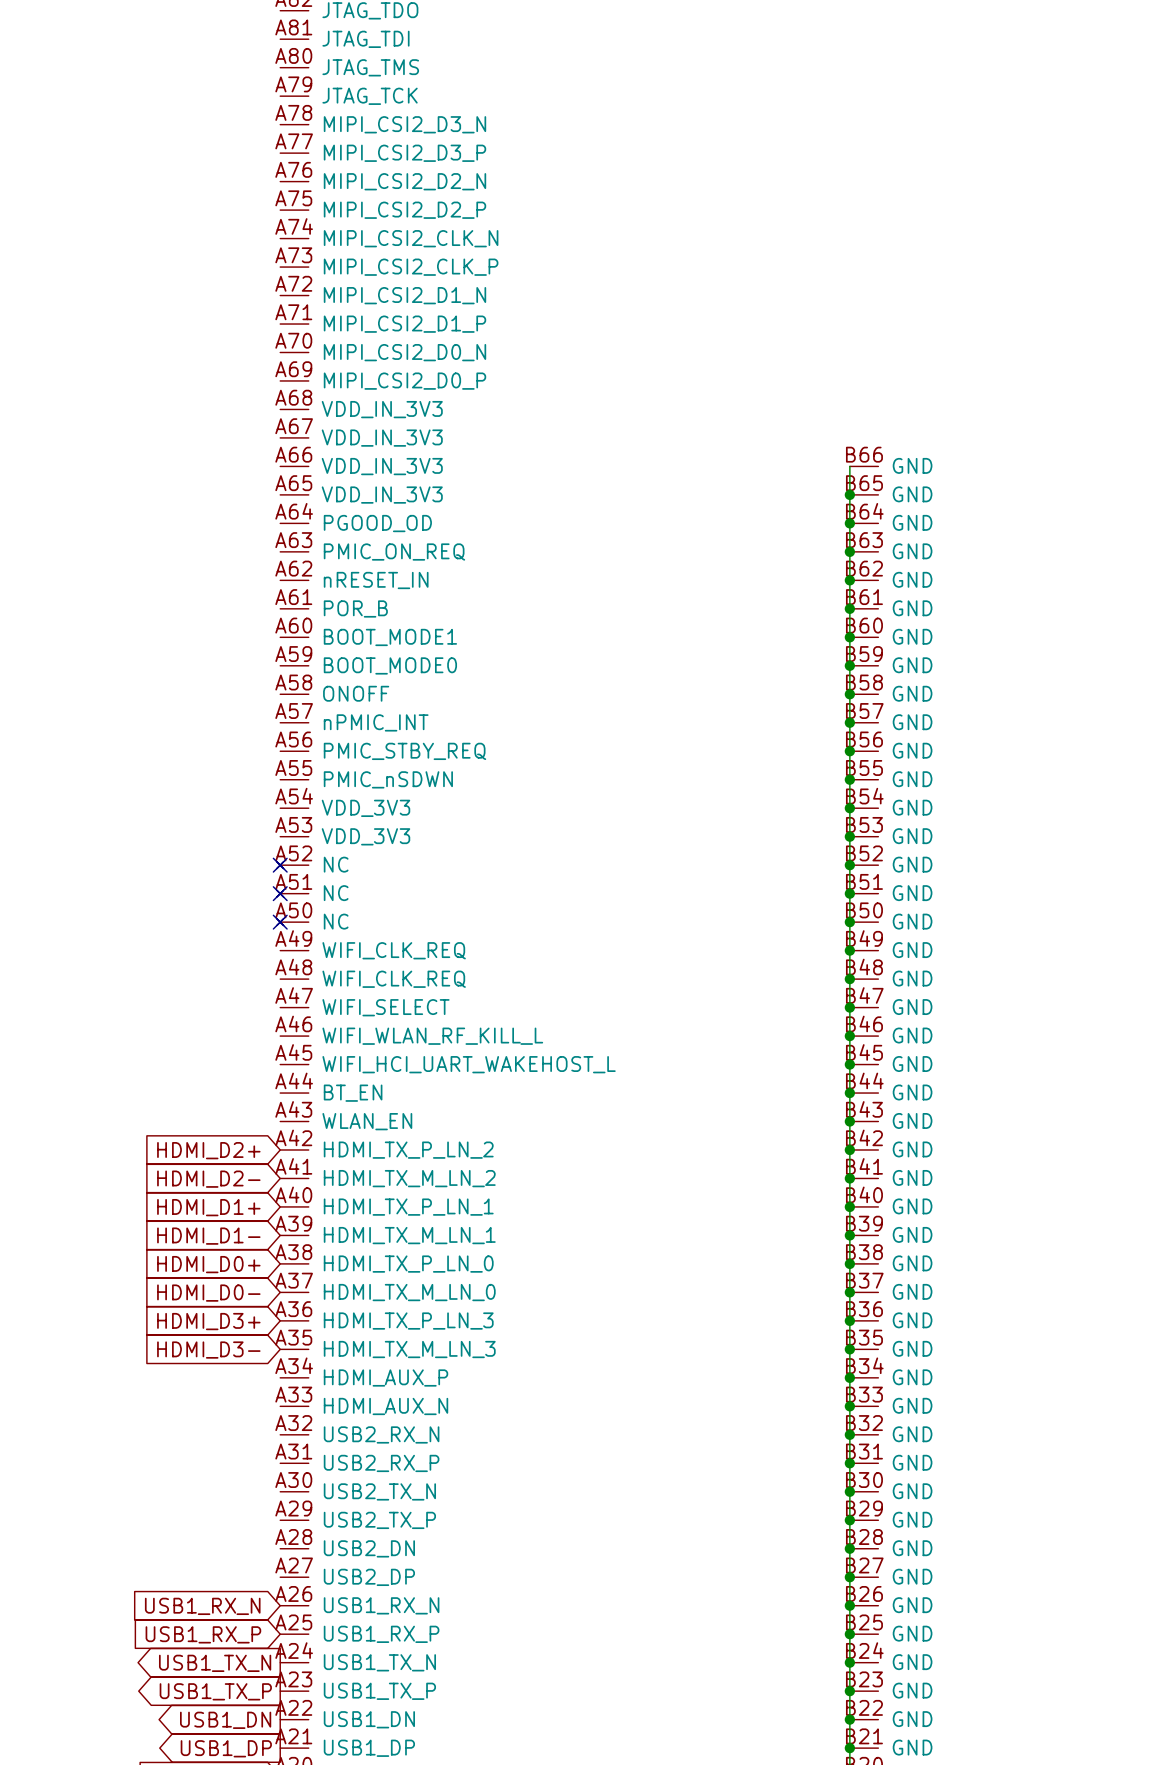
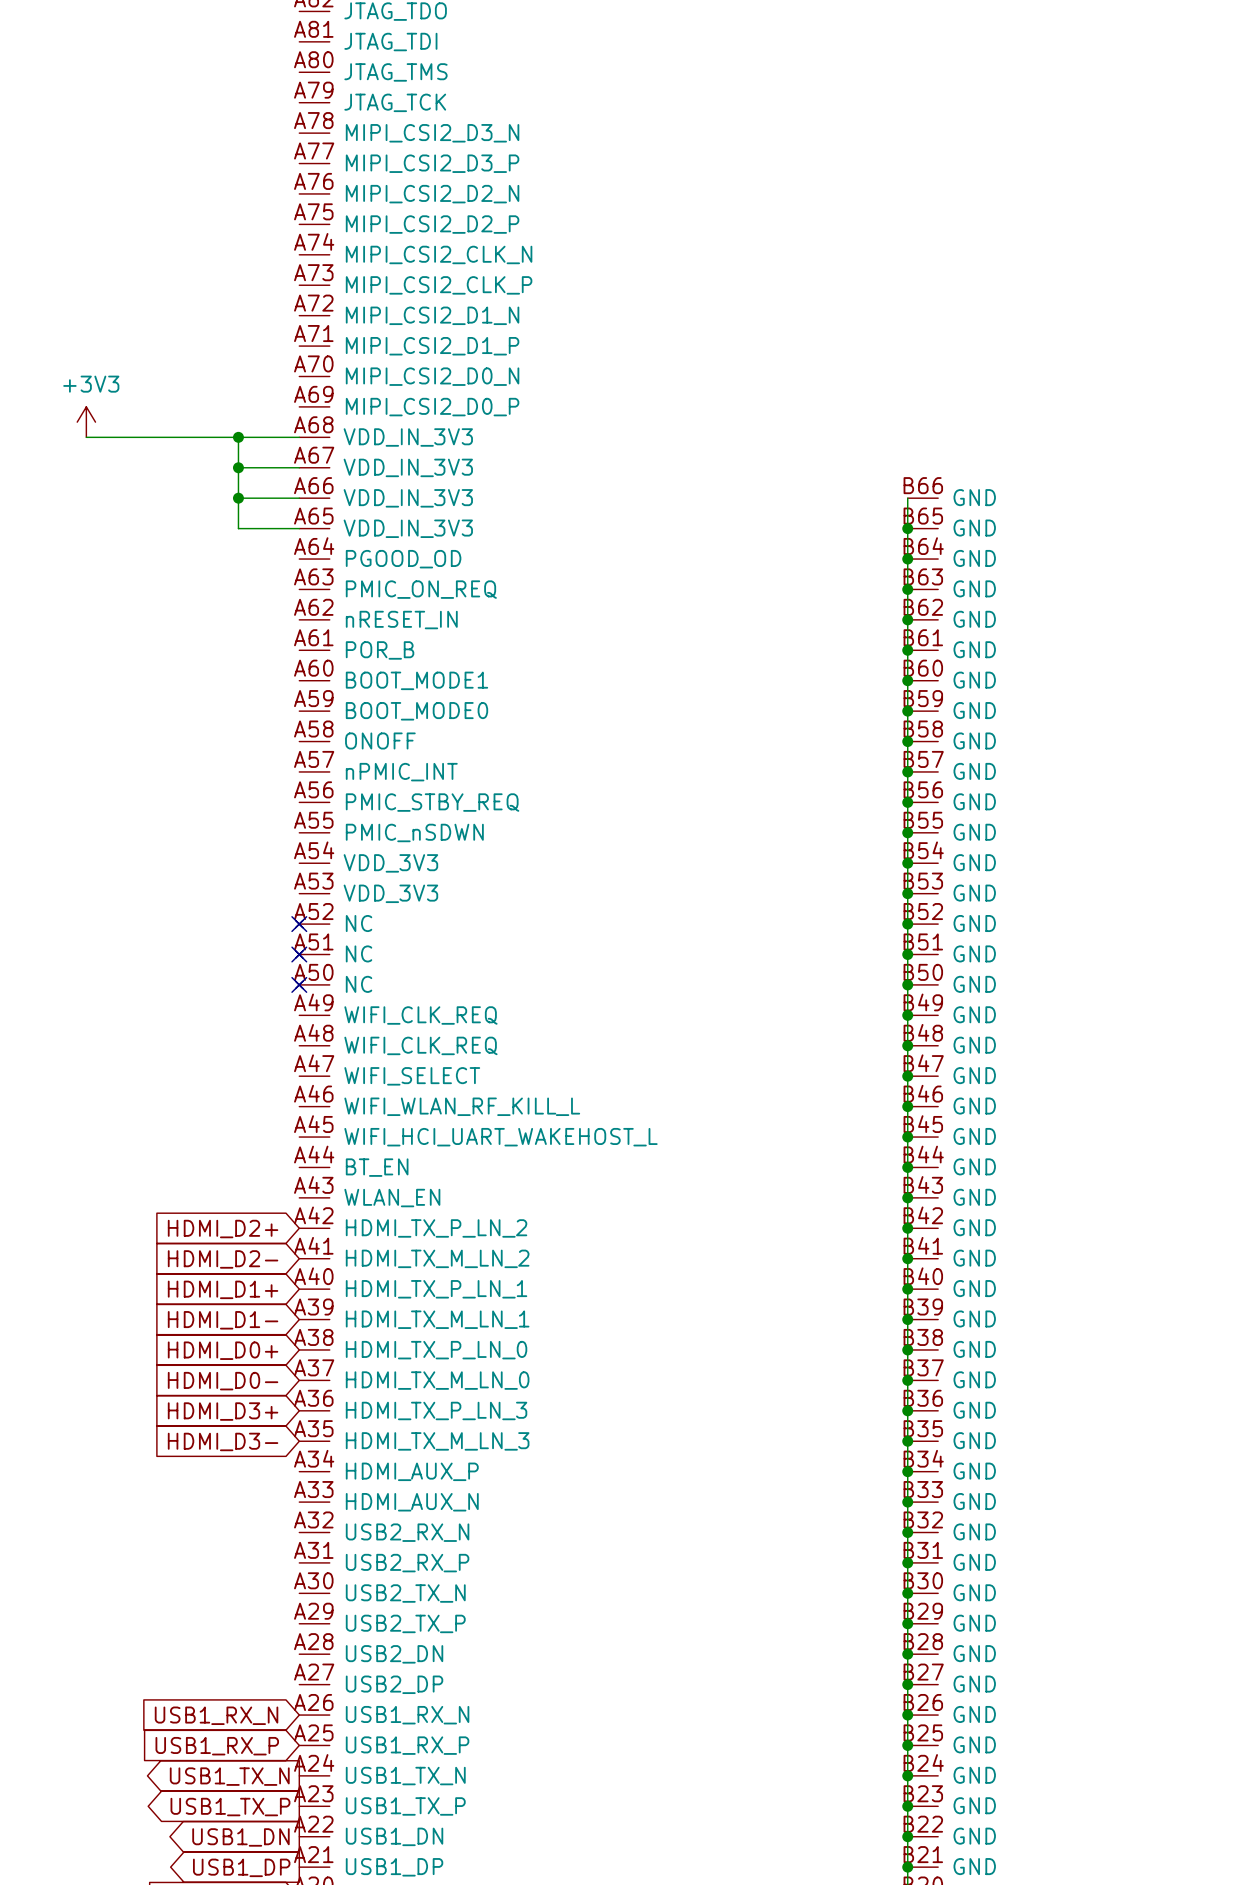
power symbol: none -> +3V3 (86, 422)
wire: none -> (86, 437) (299, 437)
wire: none -> (238, 437) (238, 528) (299, 528)
junction: none -> (238, 437)
wire: none -> (238, 467) (299, 467)
junction: none -> (238, 467)
wire: none -> (238, 498) (299, 498)
junction: none -> (238, 498)

